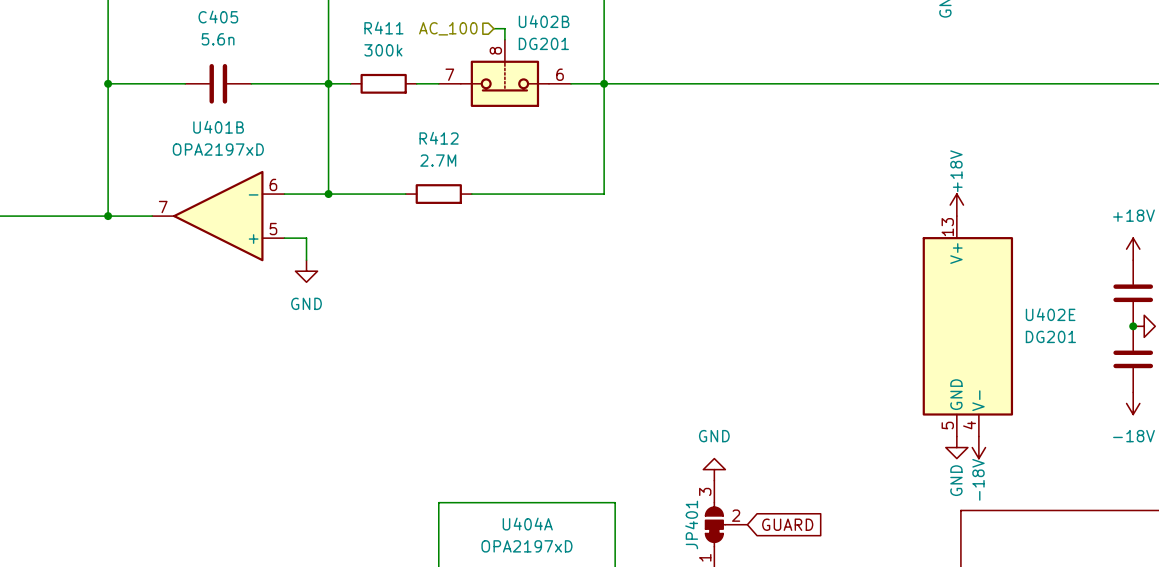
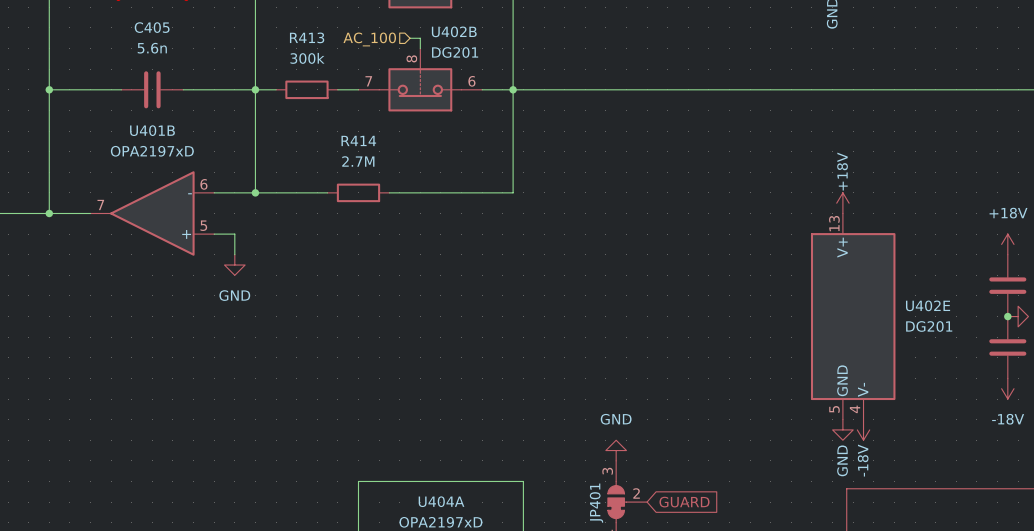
R411 name: R411 (383, 28) -> R413 (307, 37)
R412 name: R412 (439, 138) -> R414 (358, 140)

